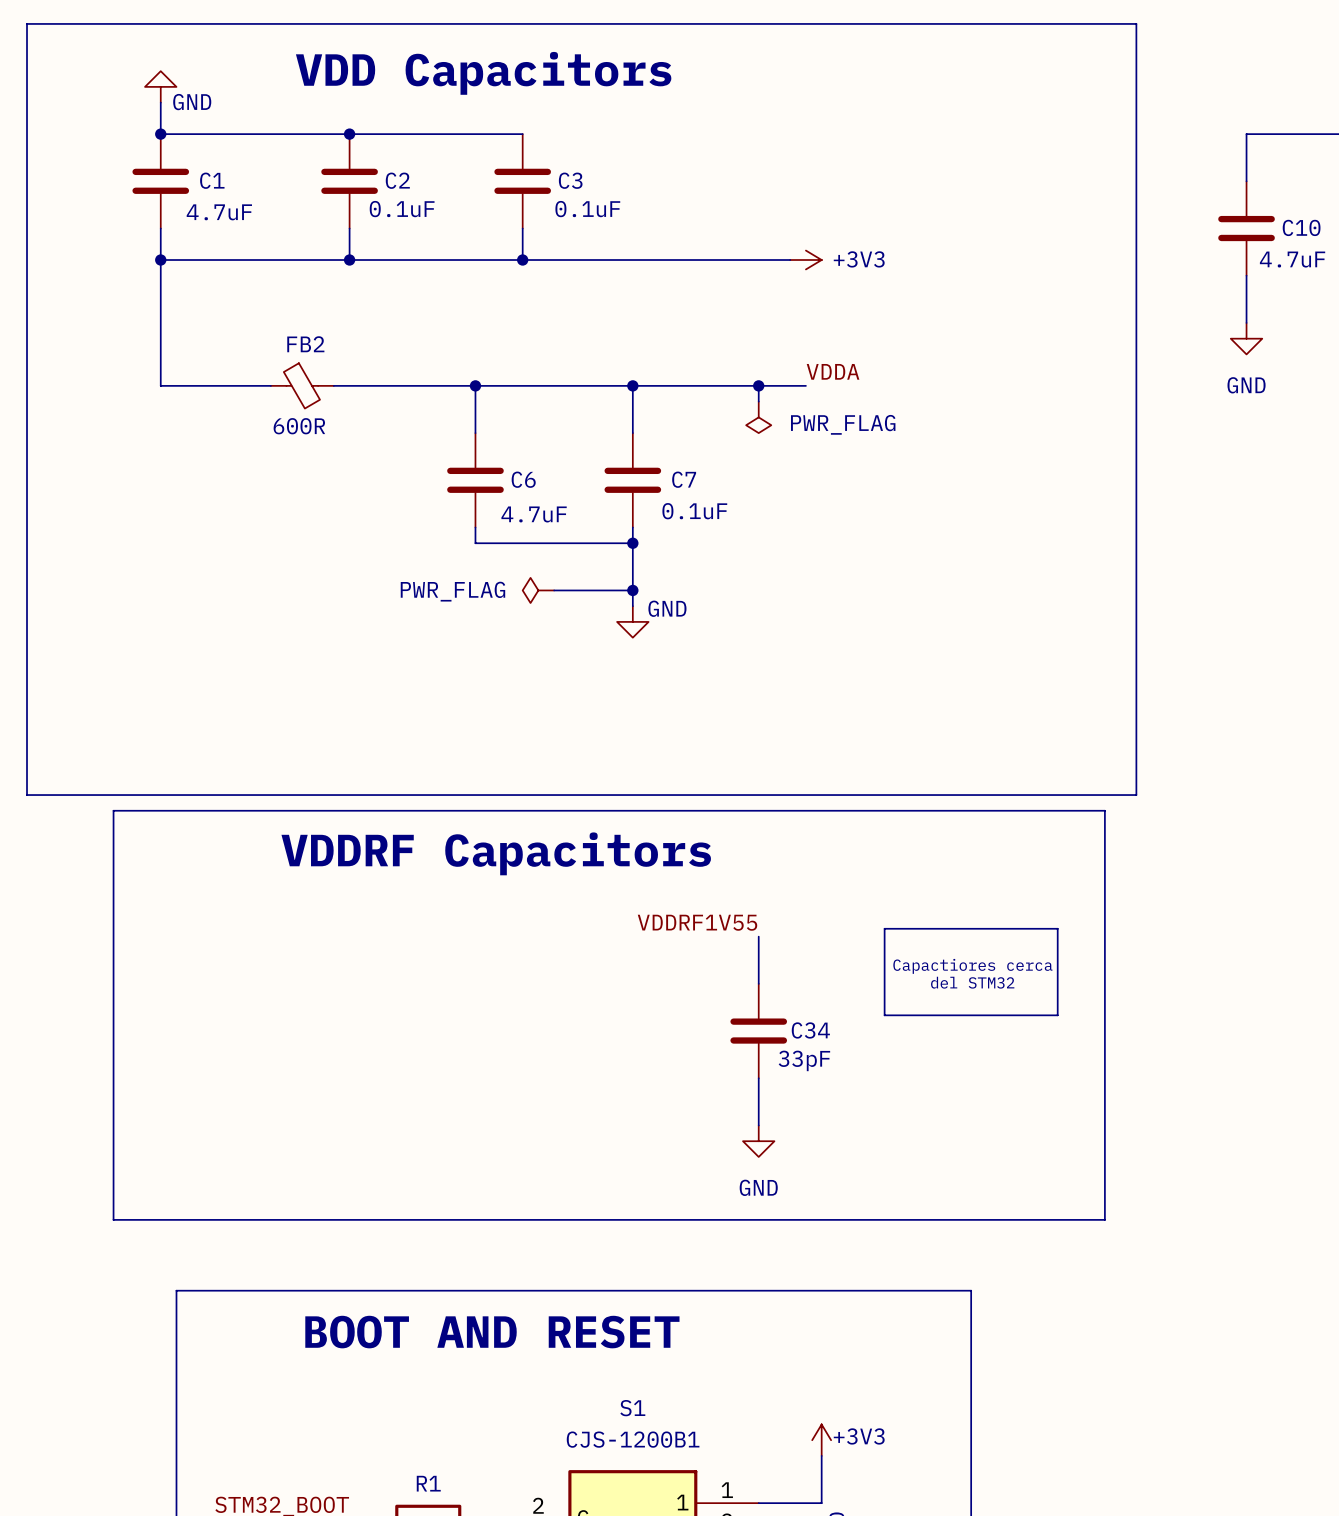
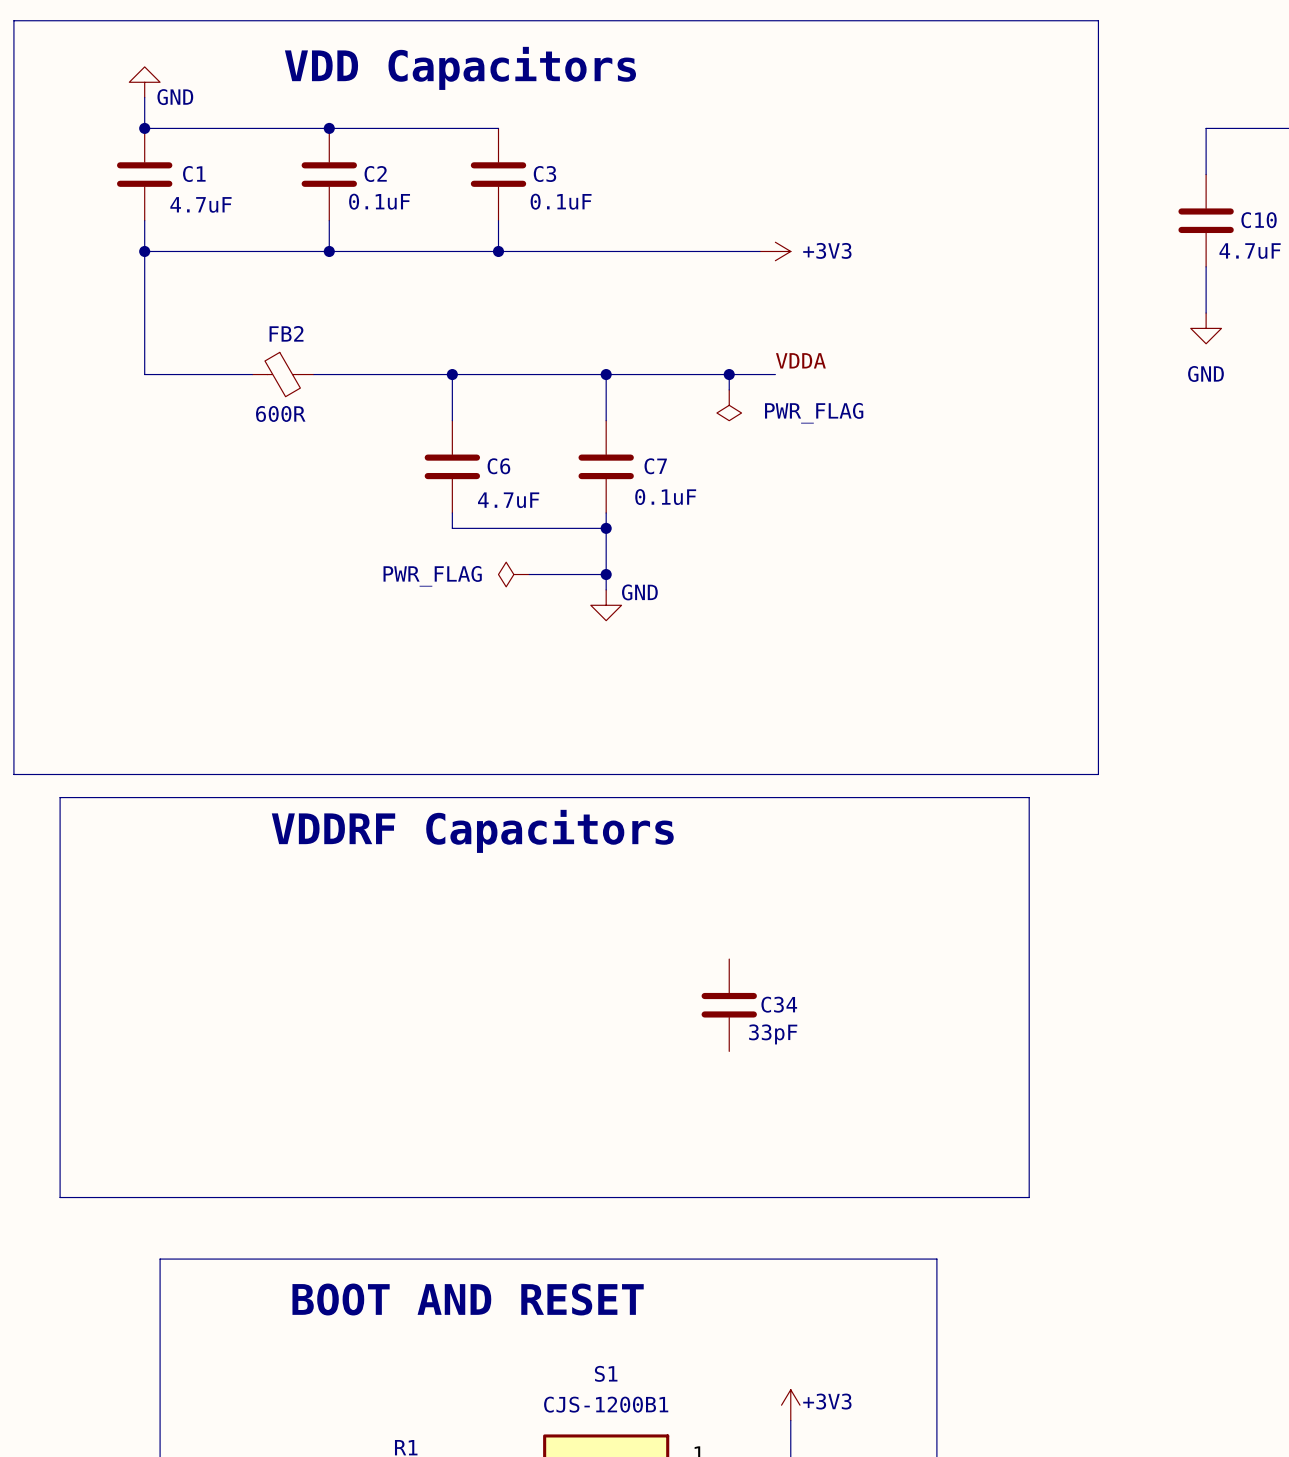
line: (113, 810) (1104, 810) (1104, 1219) (113, 1219) (113, 810) -> (60, 797) (1029, 797) (1029, 1197) (60, 1197) (60, 797)
label: VDDRF1V55 (697, 922) -> none
line: (884, 928) (1057, 928) (1057, 1015) (884, 1015) (884, 928) -> none
wire: (758, 936) (758, 983) -> none
text: Capactiores cerca (972, 966) -> none
text: del STM32 (972, 982) -> none
wire: (758, 1078) (758, 1125) -> none
power symbol: GND (758, 1141) -> none

